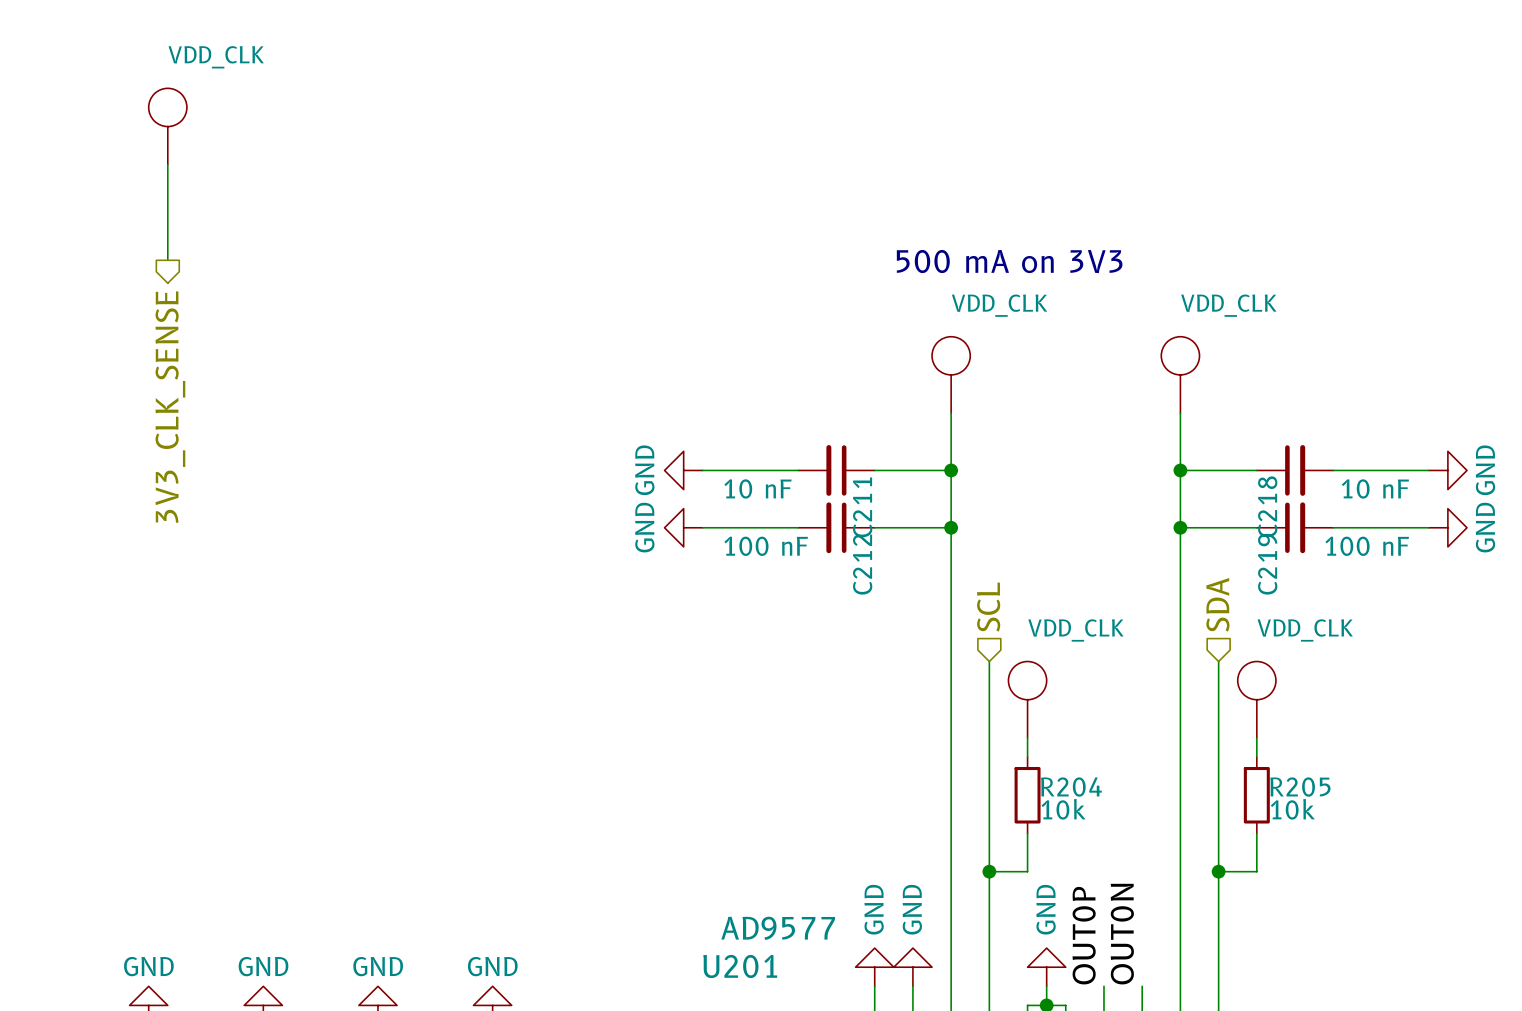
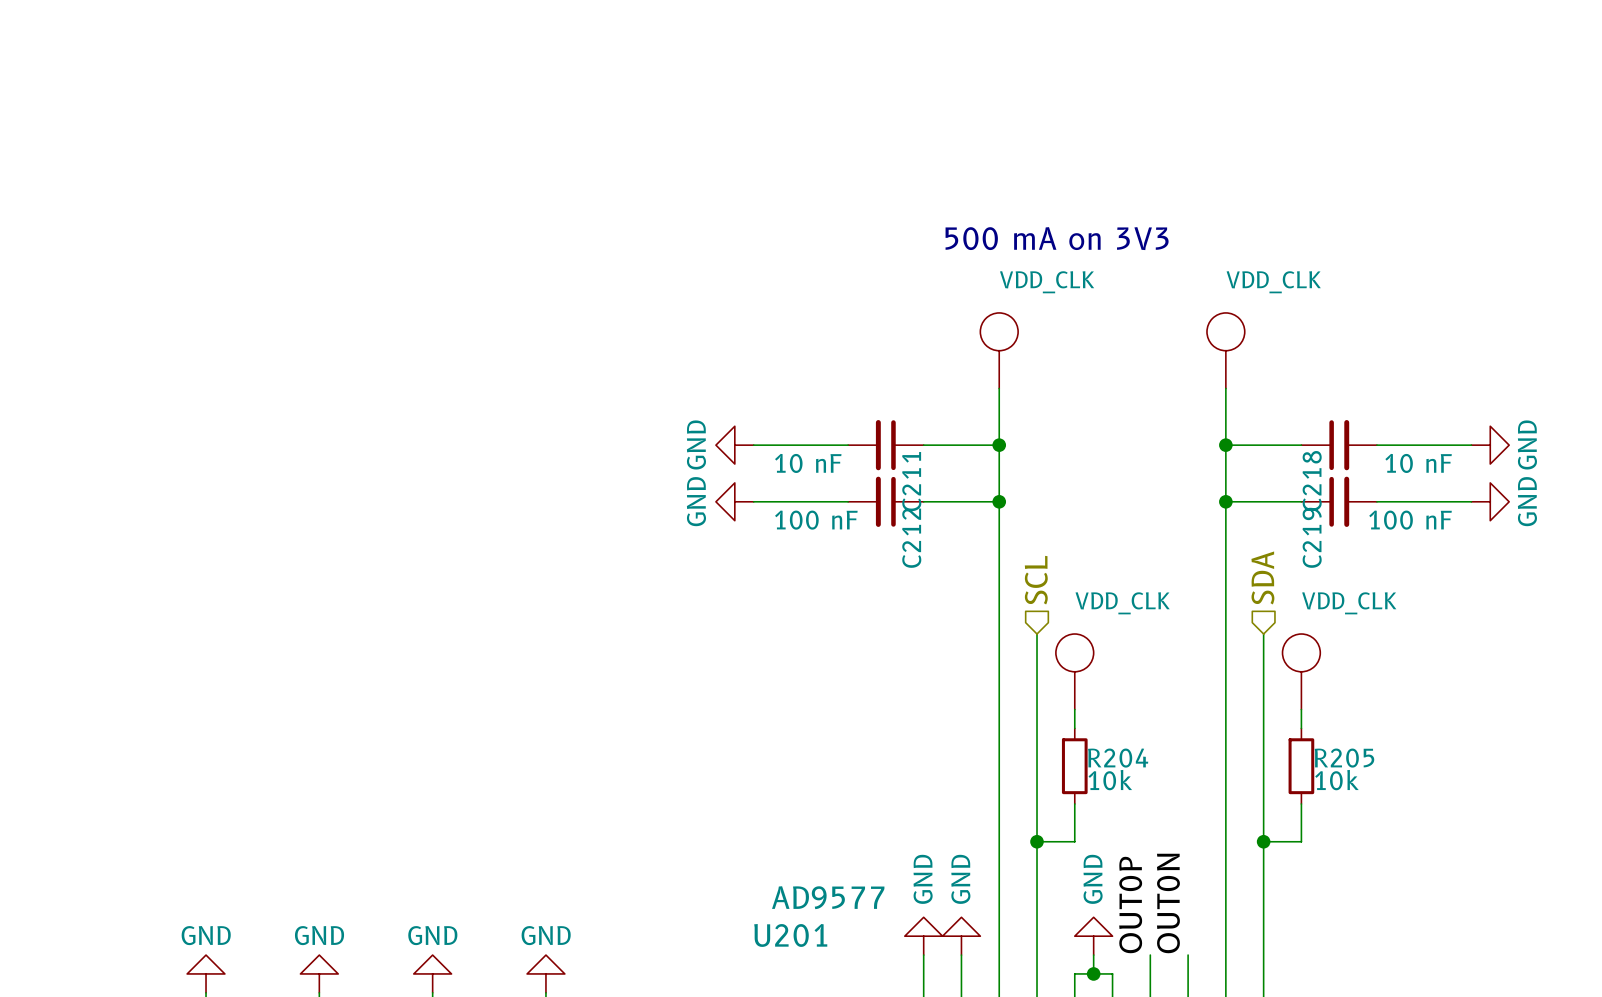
power symbol: VDD_CLK (167, 126) -> none
wire: (167, 164) (167, 260) -> none
hierarchical label: 3V3_CLK_SENSE (170, 407) -> none

